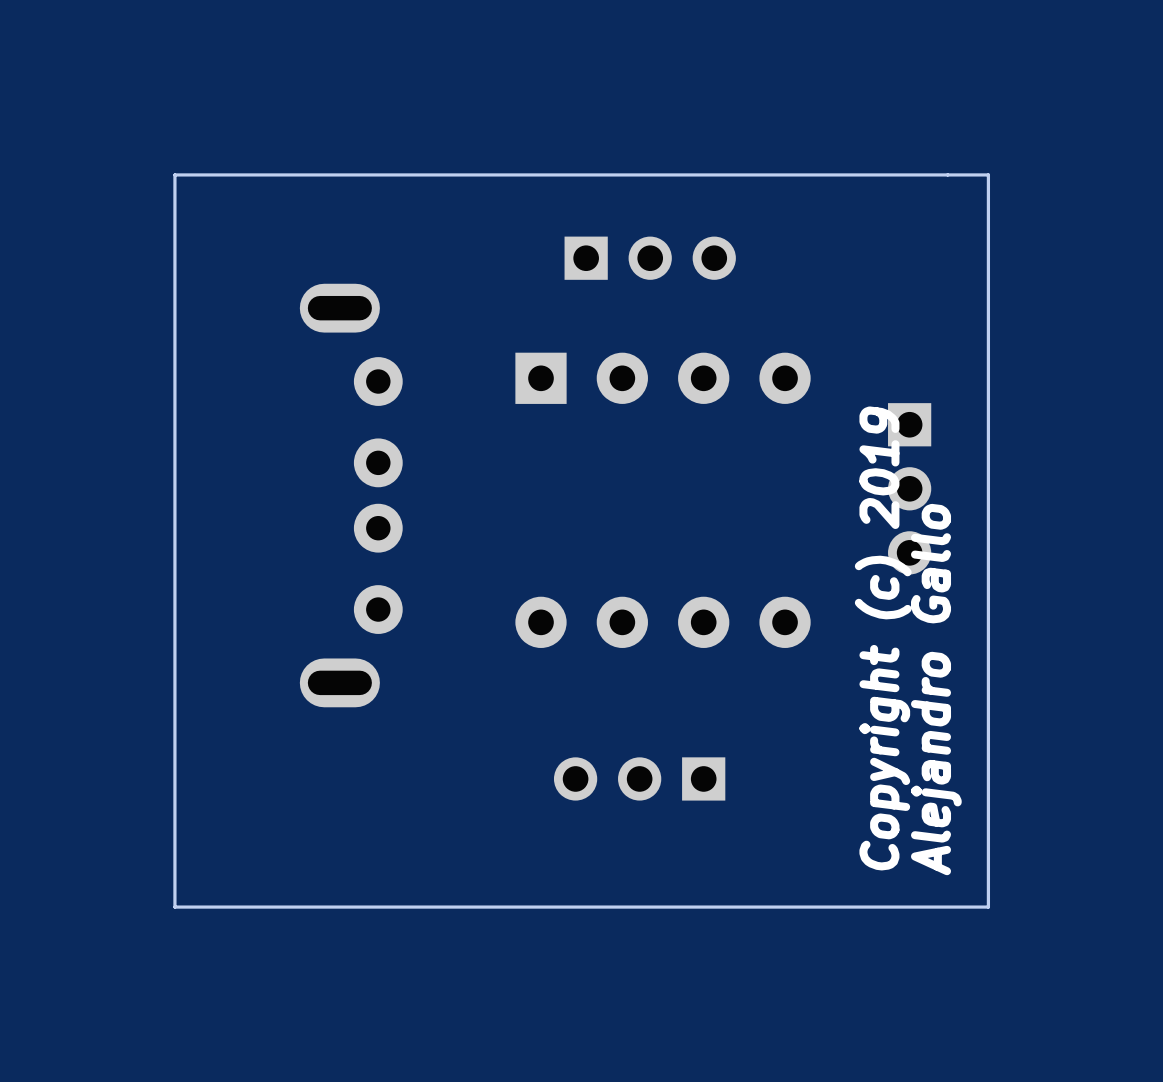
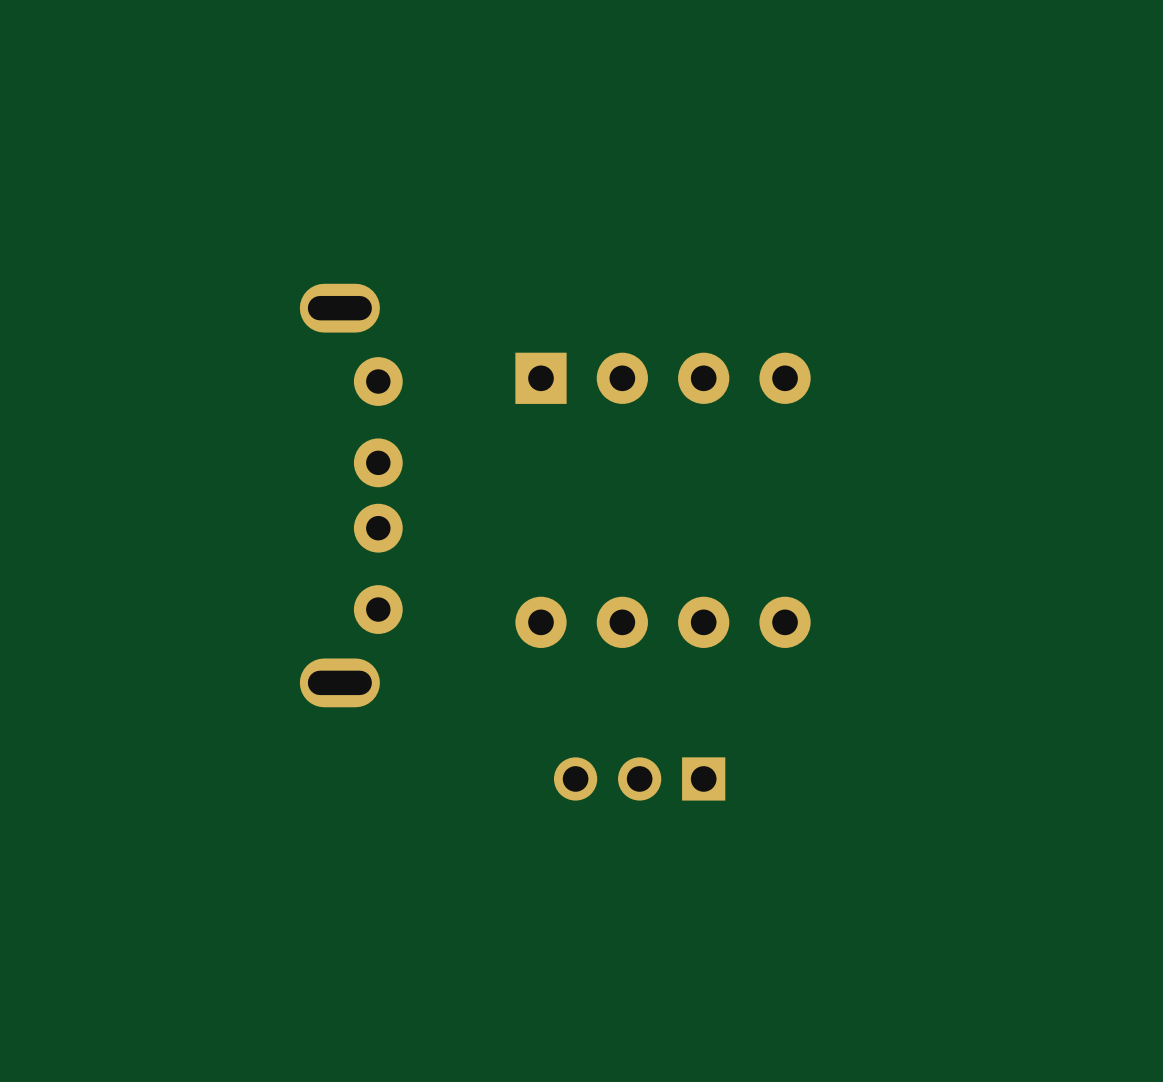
board edge: (988, 174) (174, 174) (174, 907) (988, 907) (988, 174) -> none
part: (650, 258) -> none
part: (909, 488) -> none
text: Copyright (c) 2019 (883, 638) -> none
text: Alejandro Gallo (936, 689) -> none

